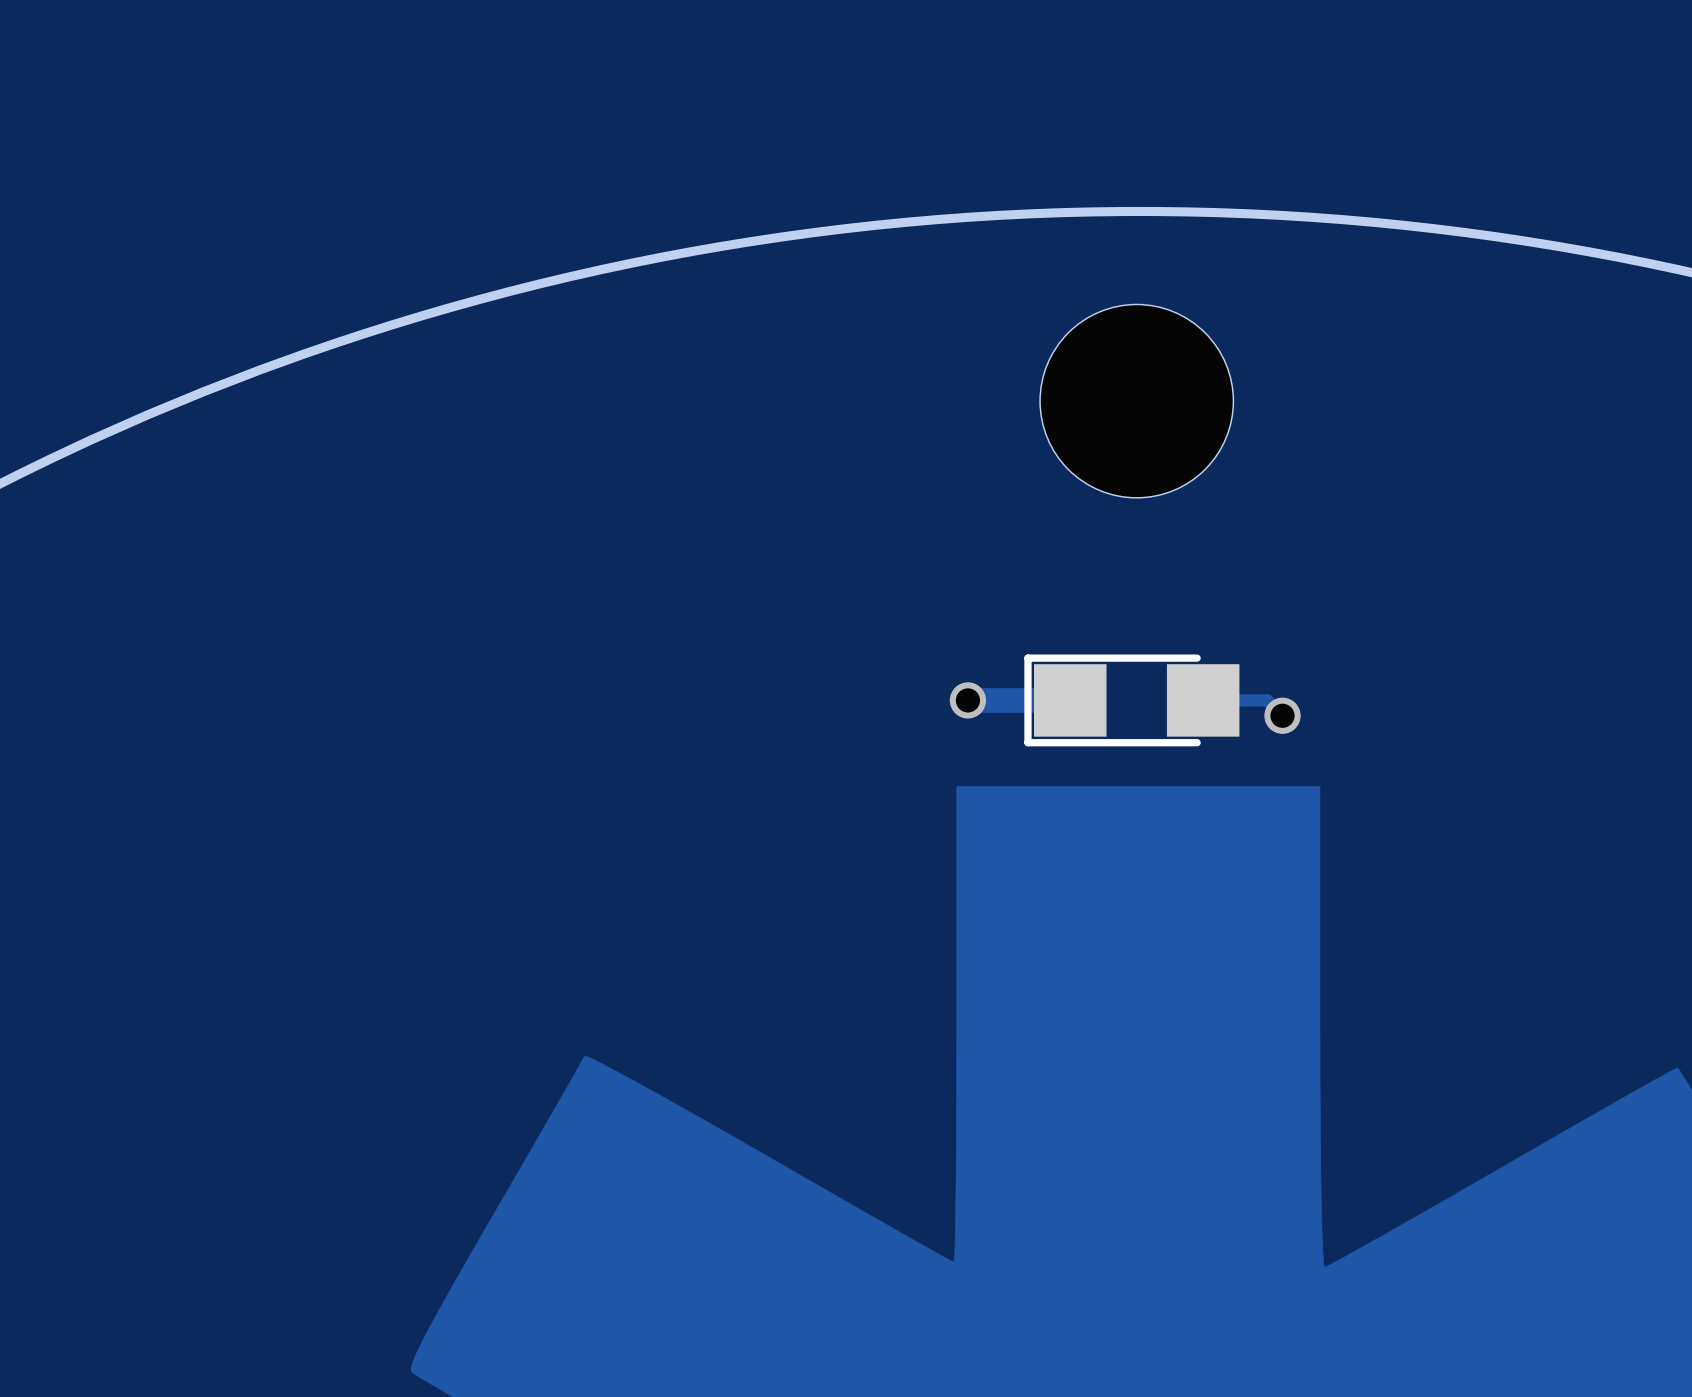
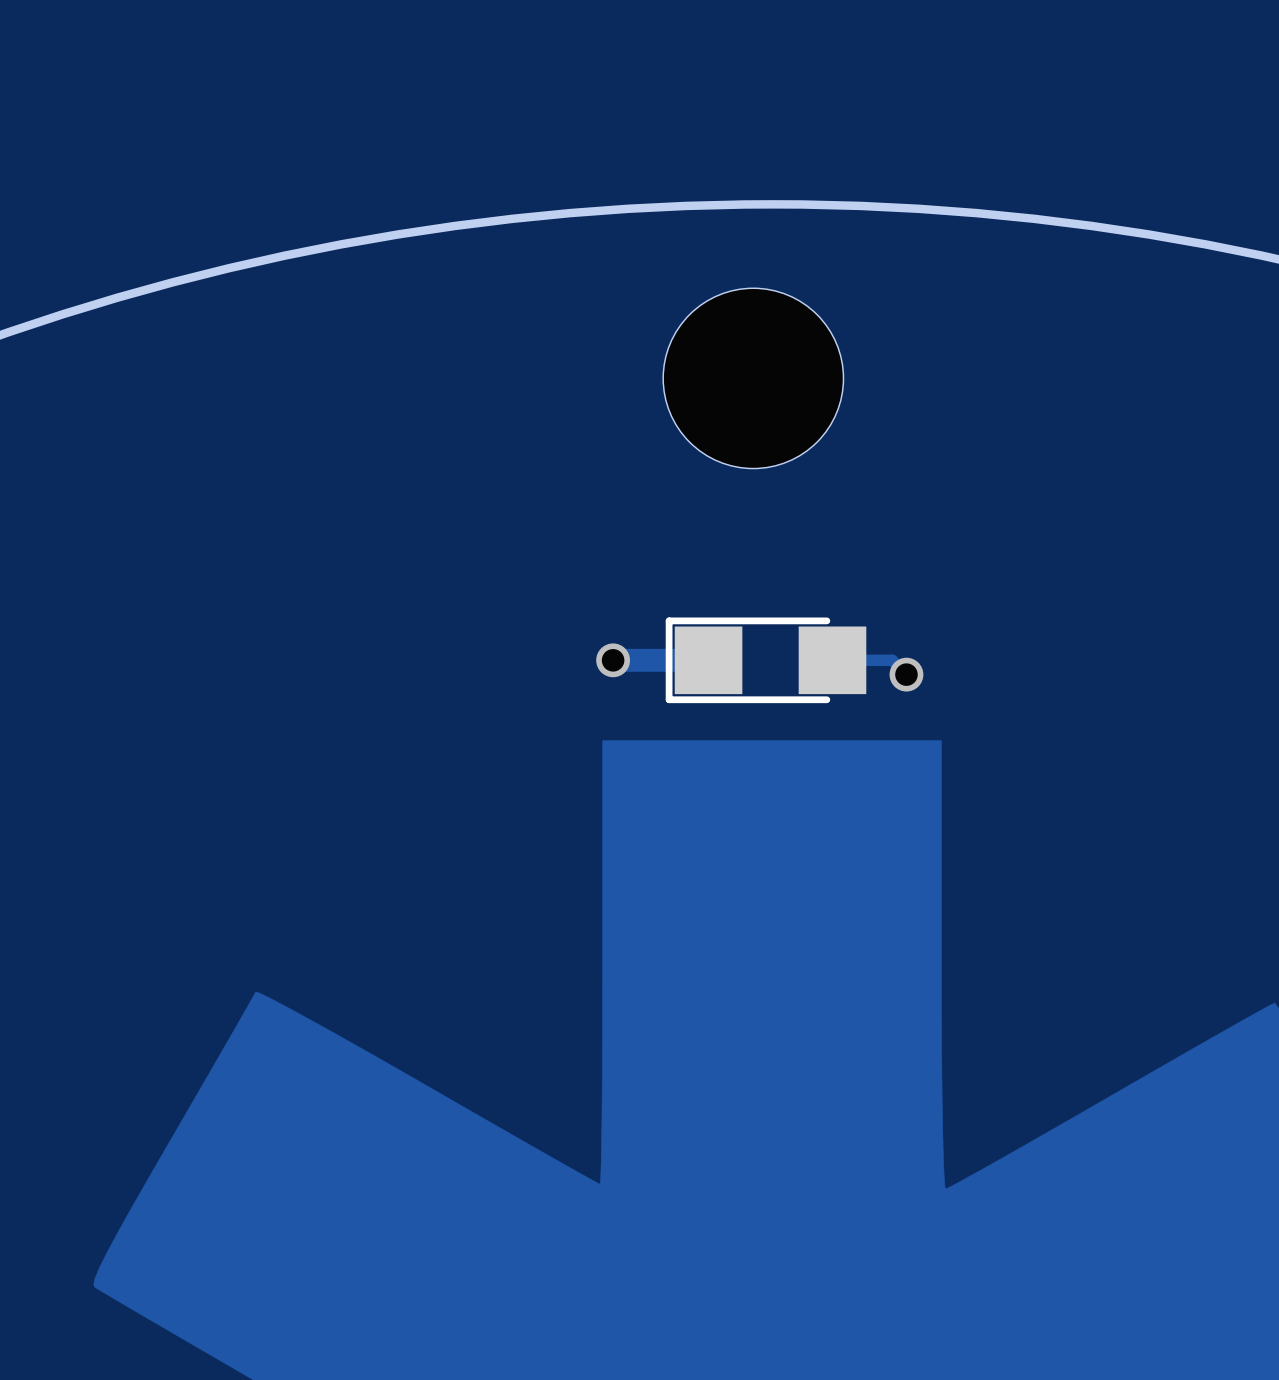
part position: (1136, 401) -> (753, 378)

